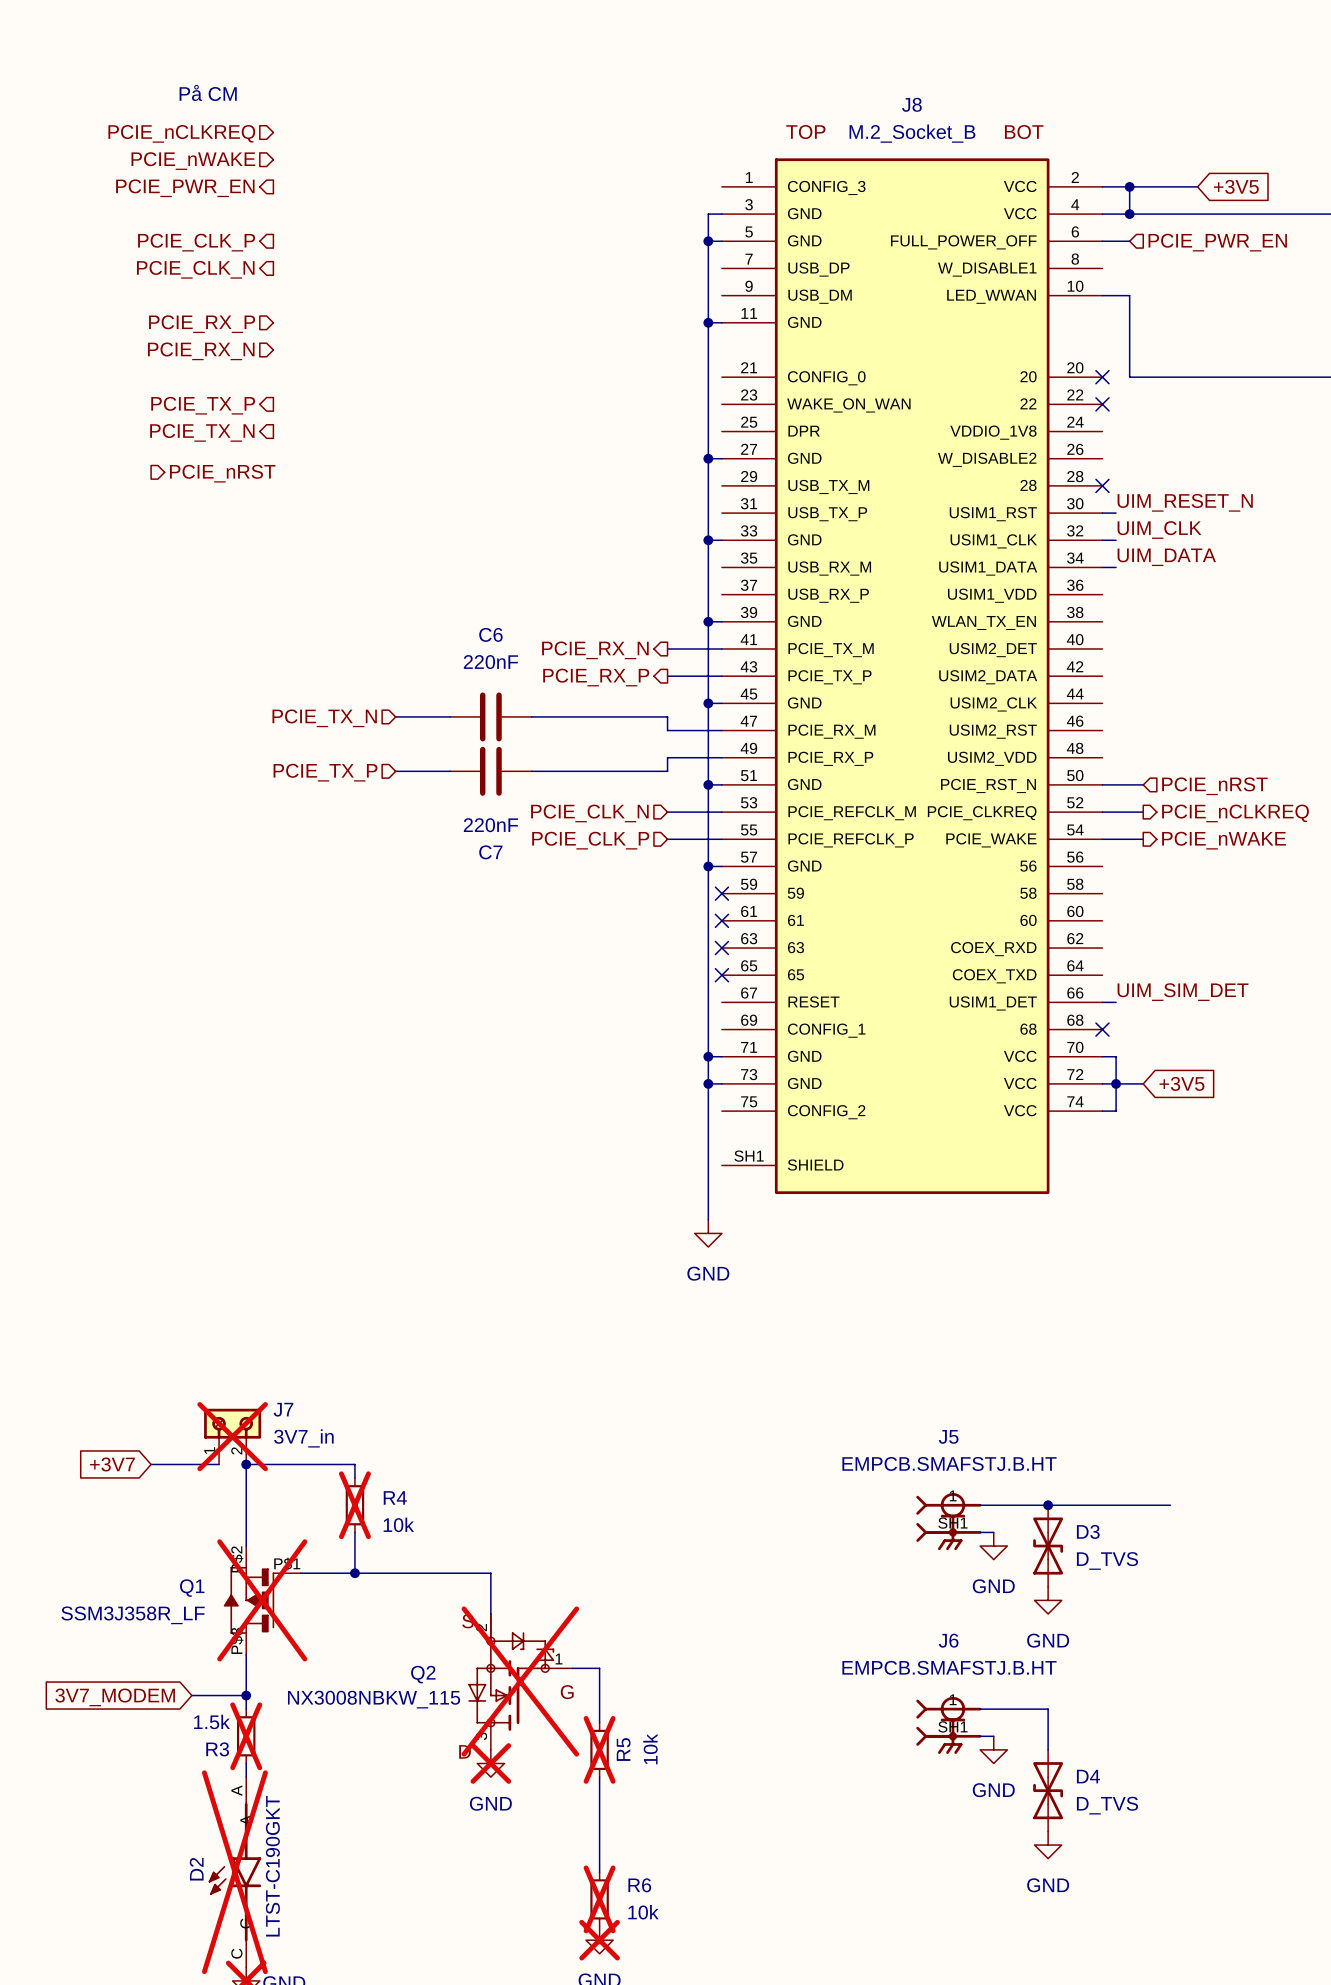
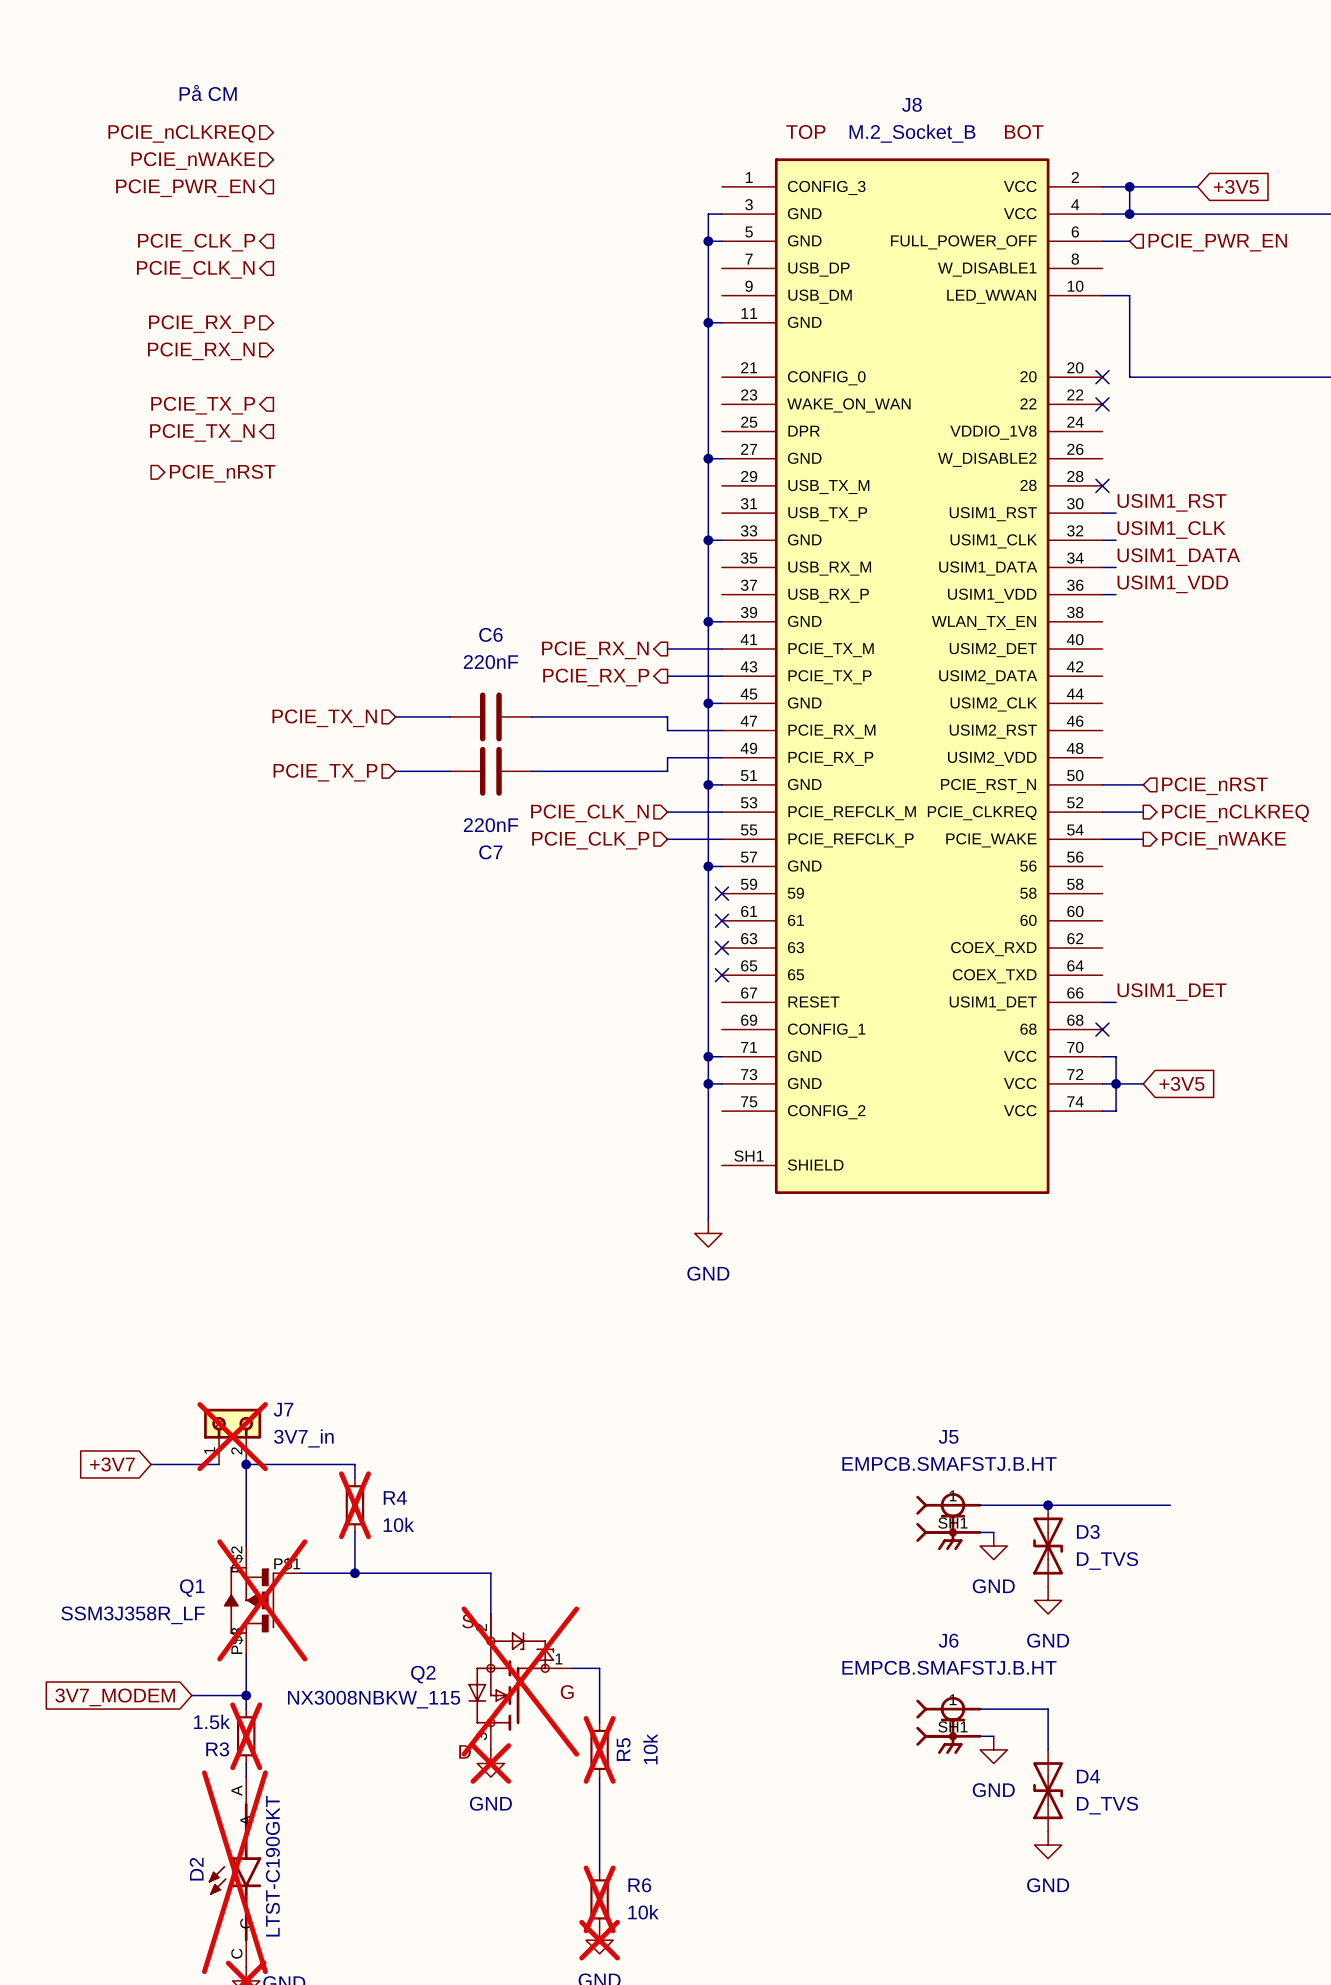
label: UIM_RESET_N (1185, 502) -> USIM1_RST (1172, 502)
label: UIM_CLK (1159, 530) -> USIM1_CLK (1171, 530)
label: UIM_DATA (1166, 557) -> USIM1_DATA (1178, 557)
label: none -> USIM1_VDD (1172, 584)
wire: none -> (1102, 594) (1116, 594)
label: UIM_SIM_DET (1183, 992) -> USIM1_DET (1172, 992)

